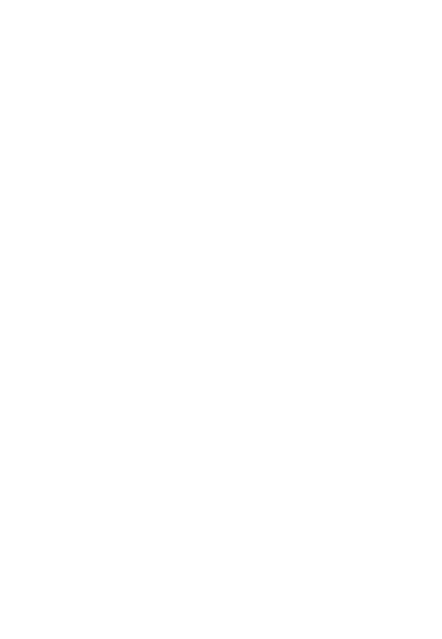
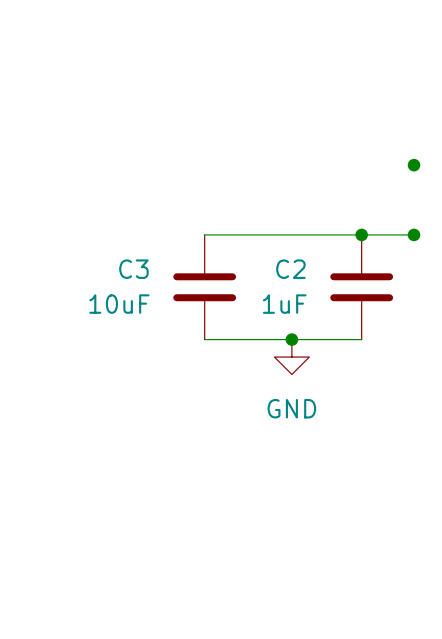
junction: none -> (414, 165)
wire: none -> (204, 234) (414, 234)
junction: none -> (361, 234)
junction: none -> (414, 234)
C3: none -> 10uF (204, 287)
C2: none -> 1uF (361, 287)
wire: none -> (204, 339) (361, 339)
junction: none -> (291, 339)
power symbol: none -> GND (291, 357)

